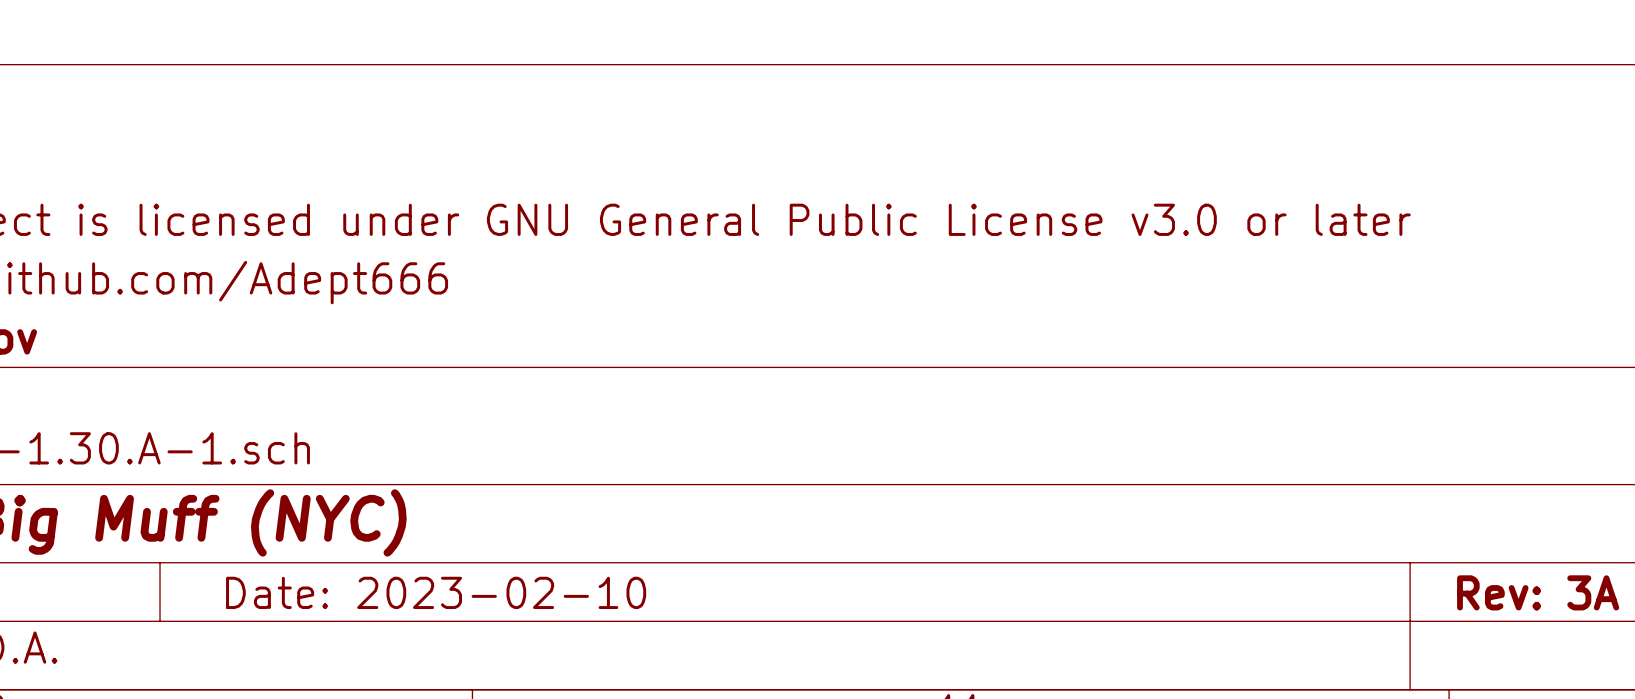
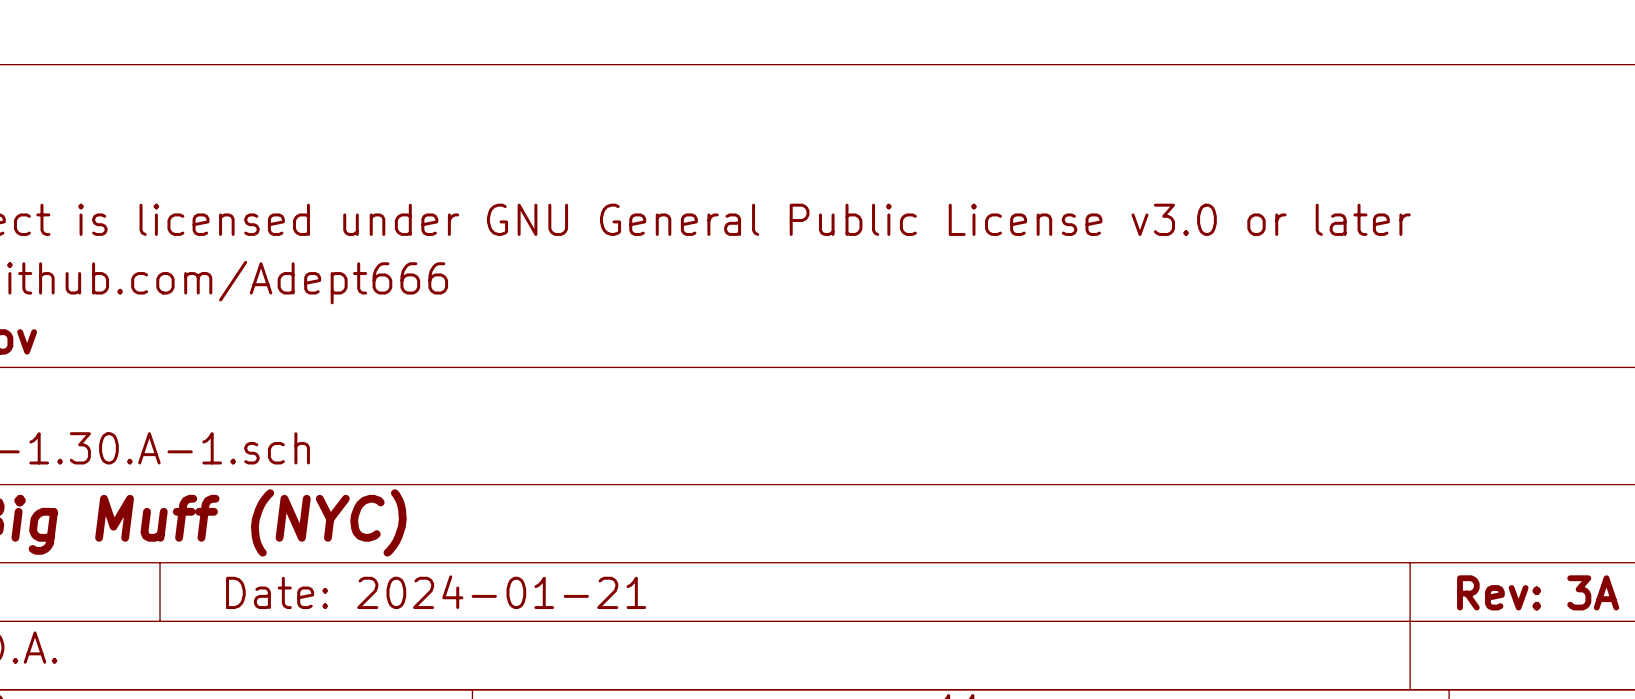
title block: Date: 2023-02-10 (436, 592) -> Date: 2024-01-21 (436, 592)

